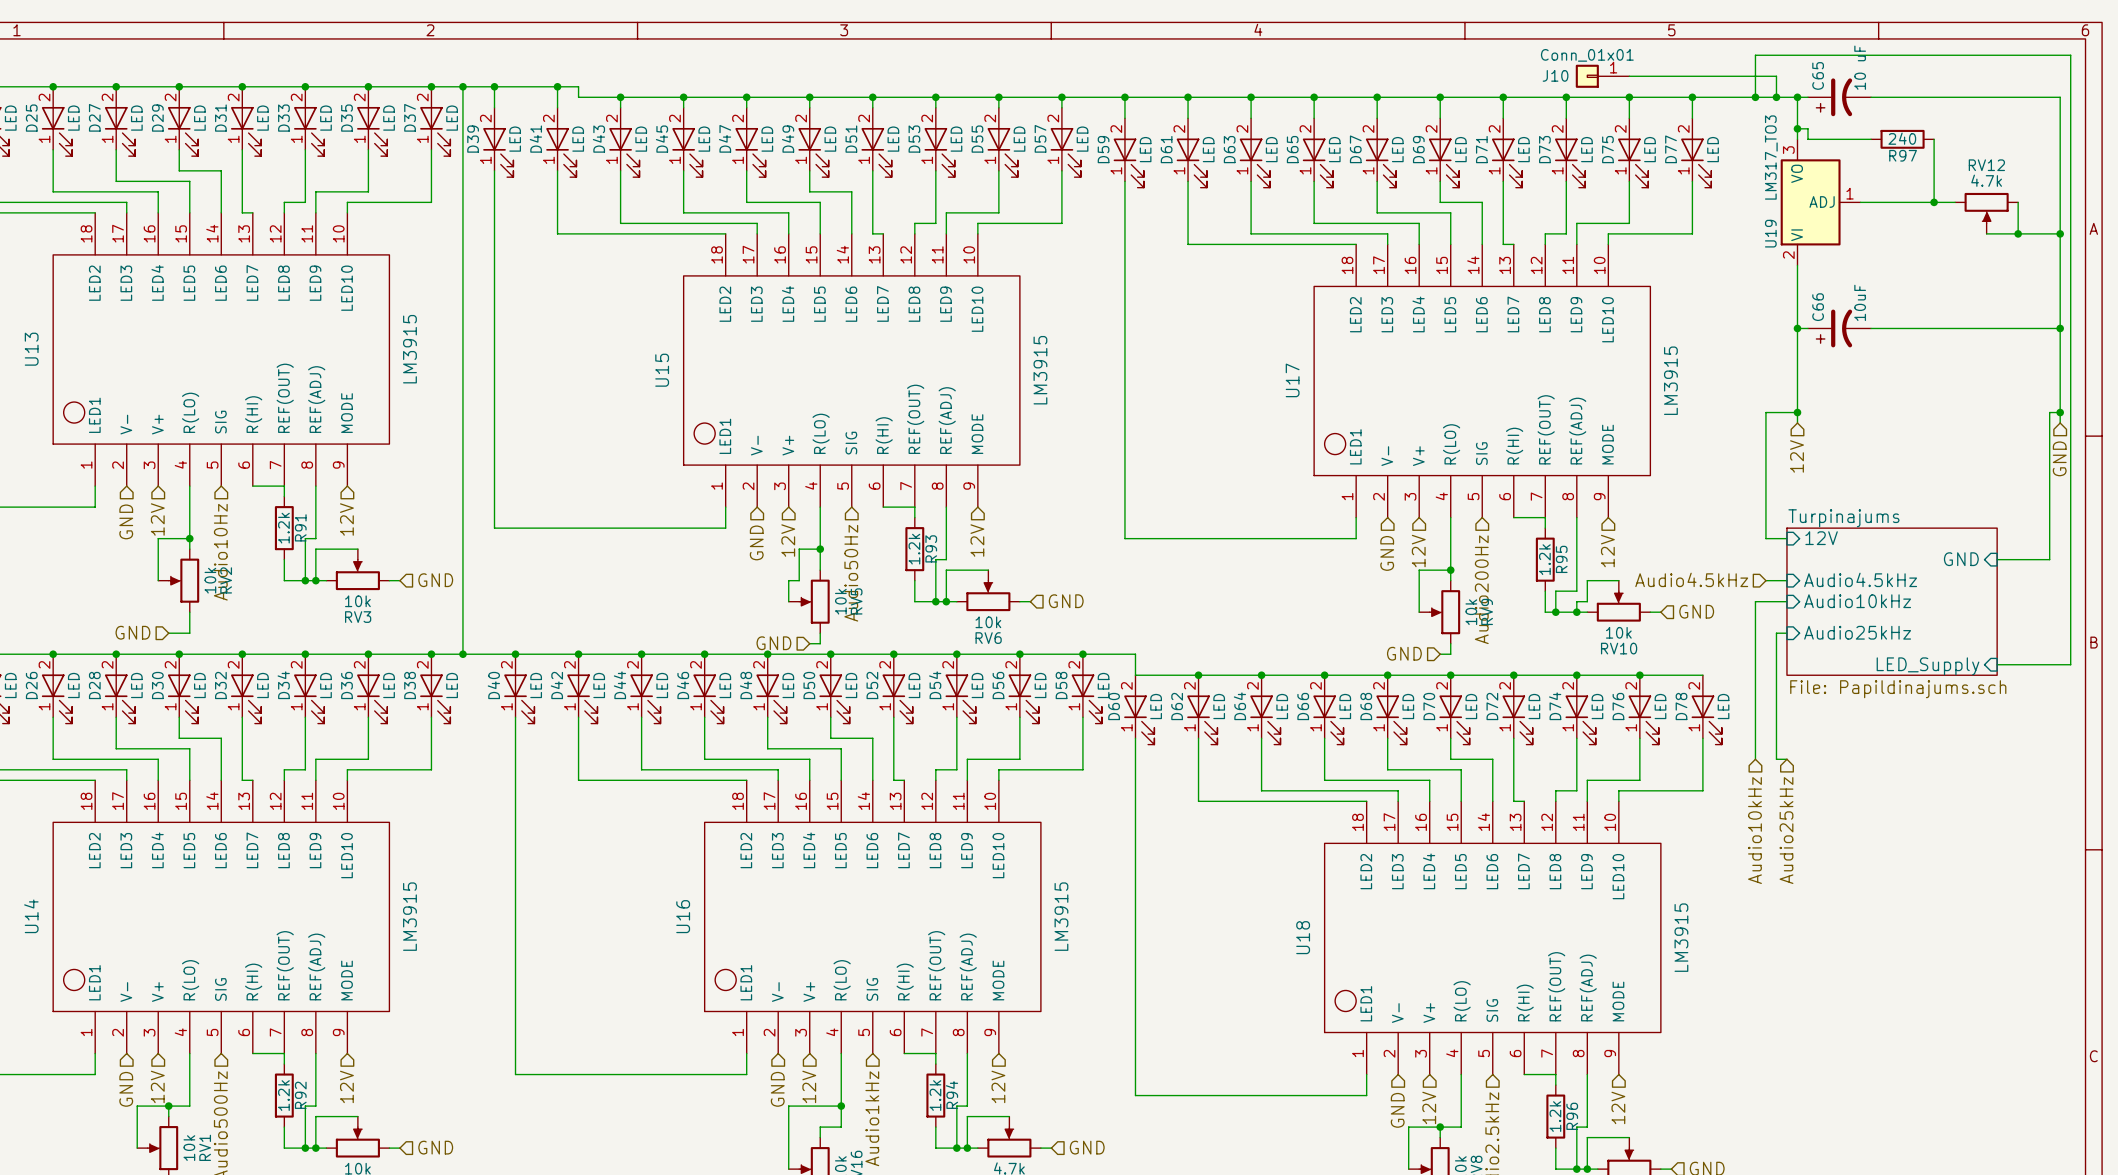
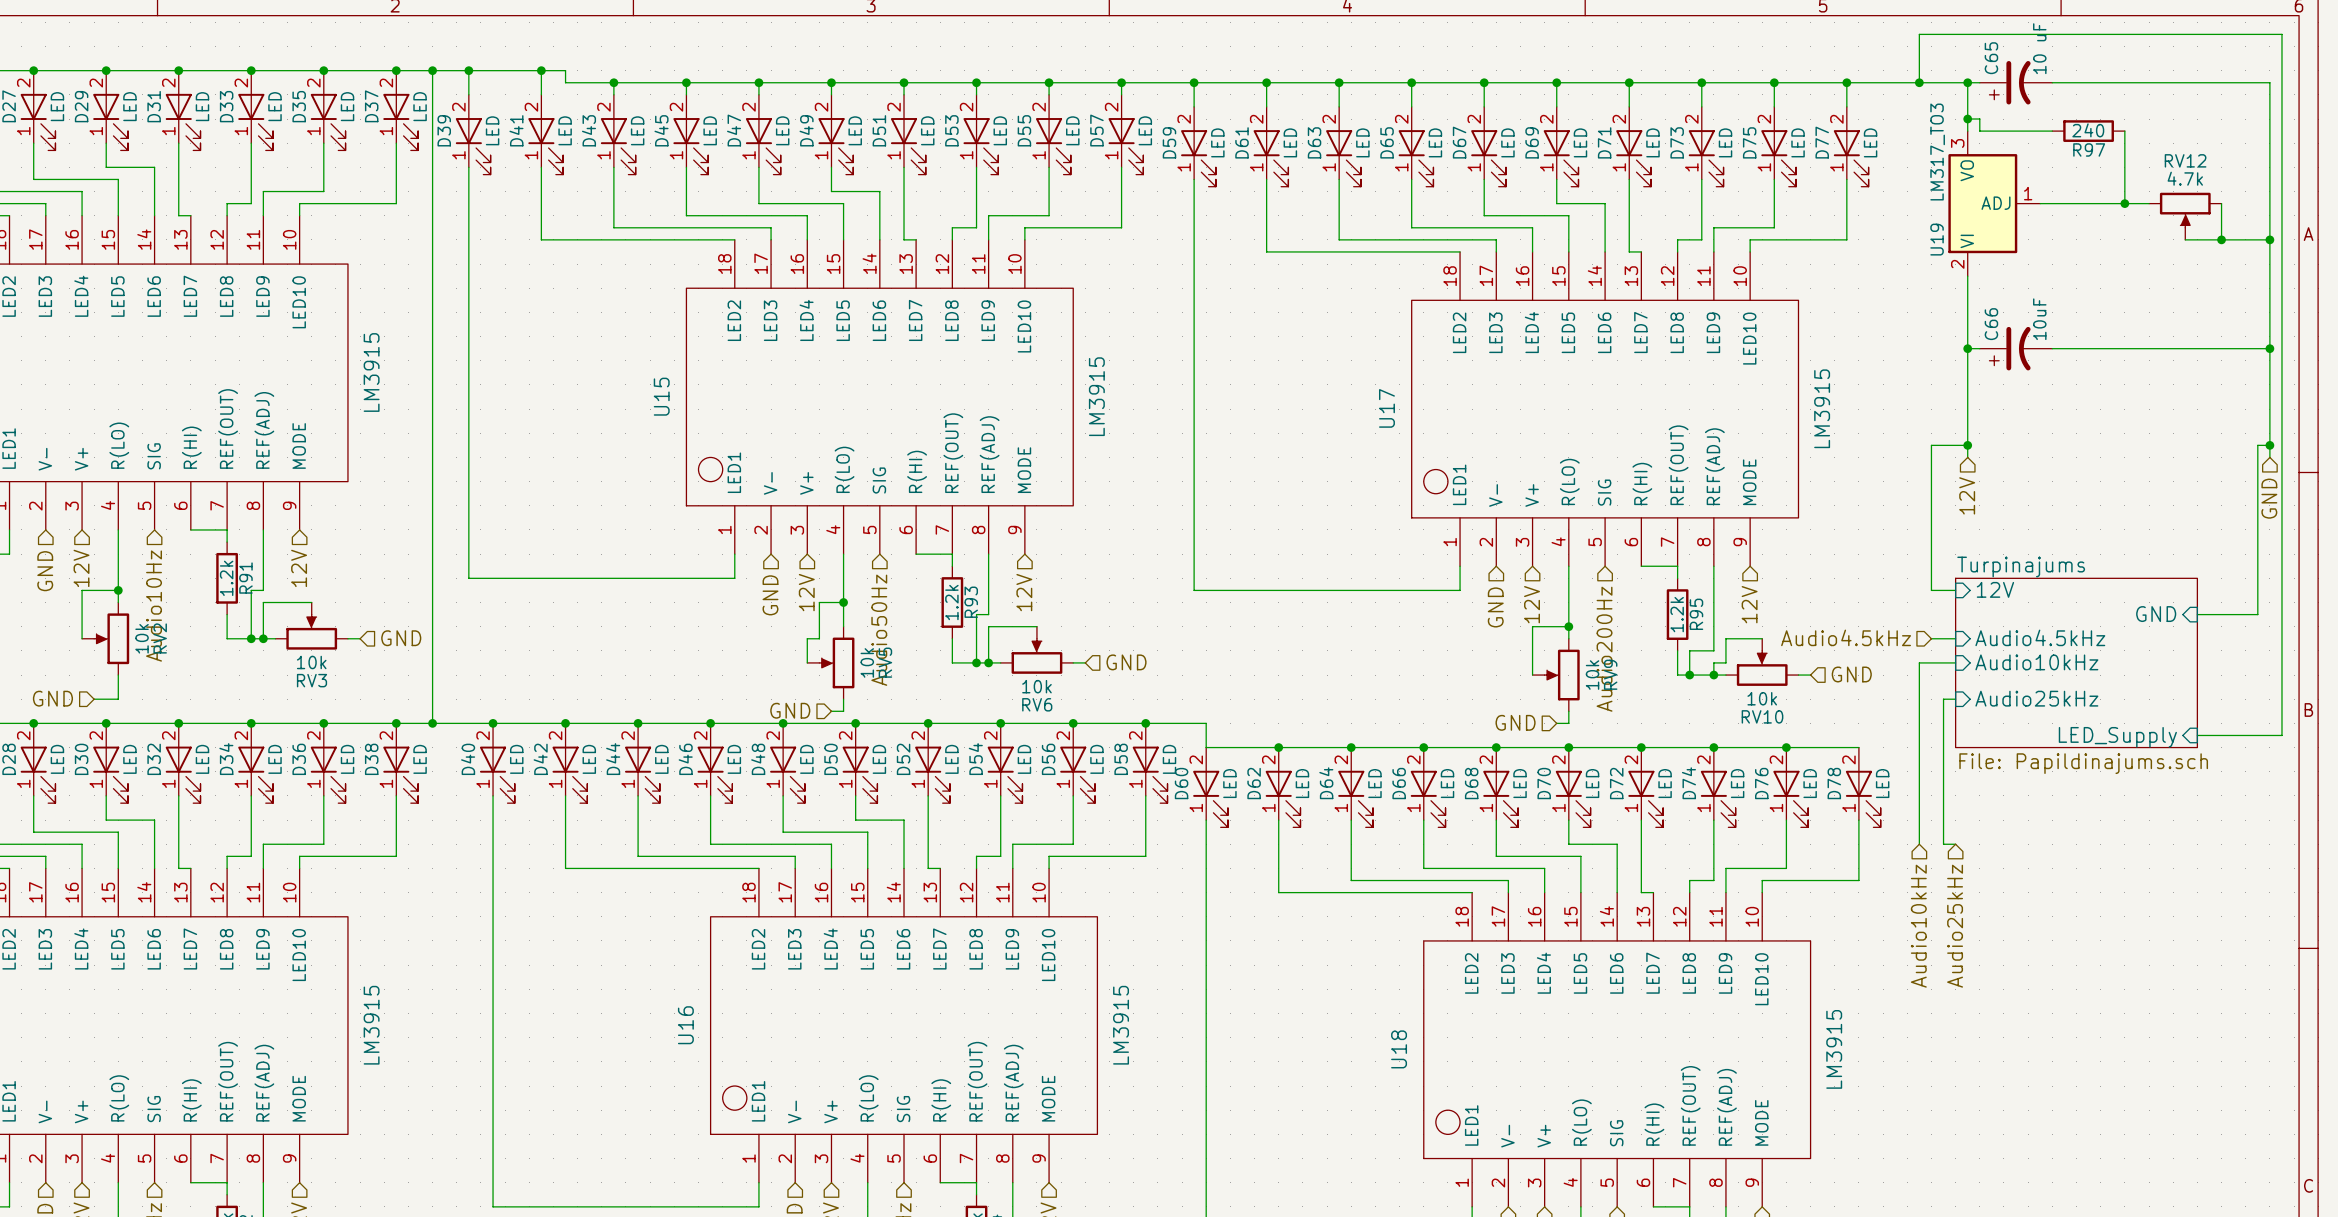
J10: Conn_01x01 (1602, 76) -> none
wire: (1629, 76) (1776, 76) (1776, 97) -> none
junction: (1776, 97) -> none

